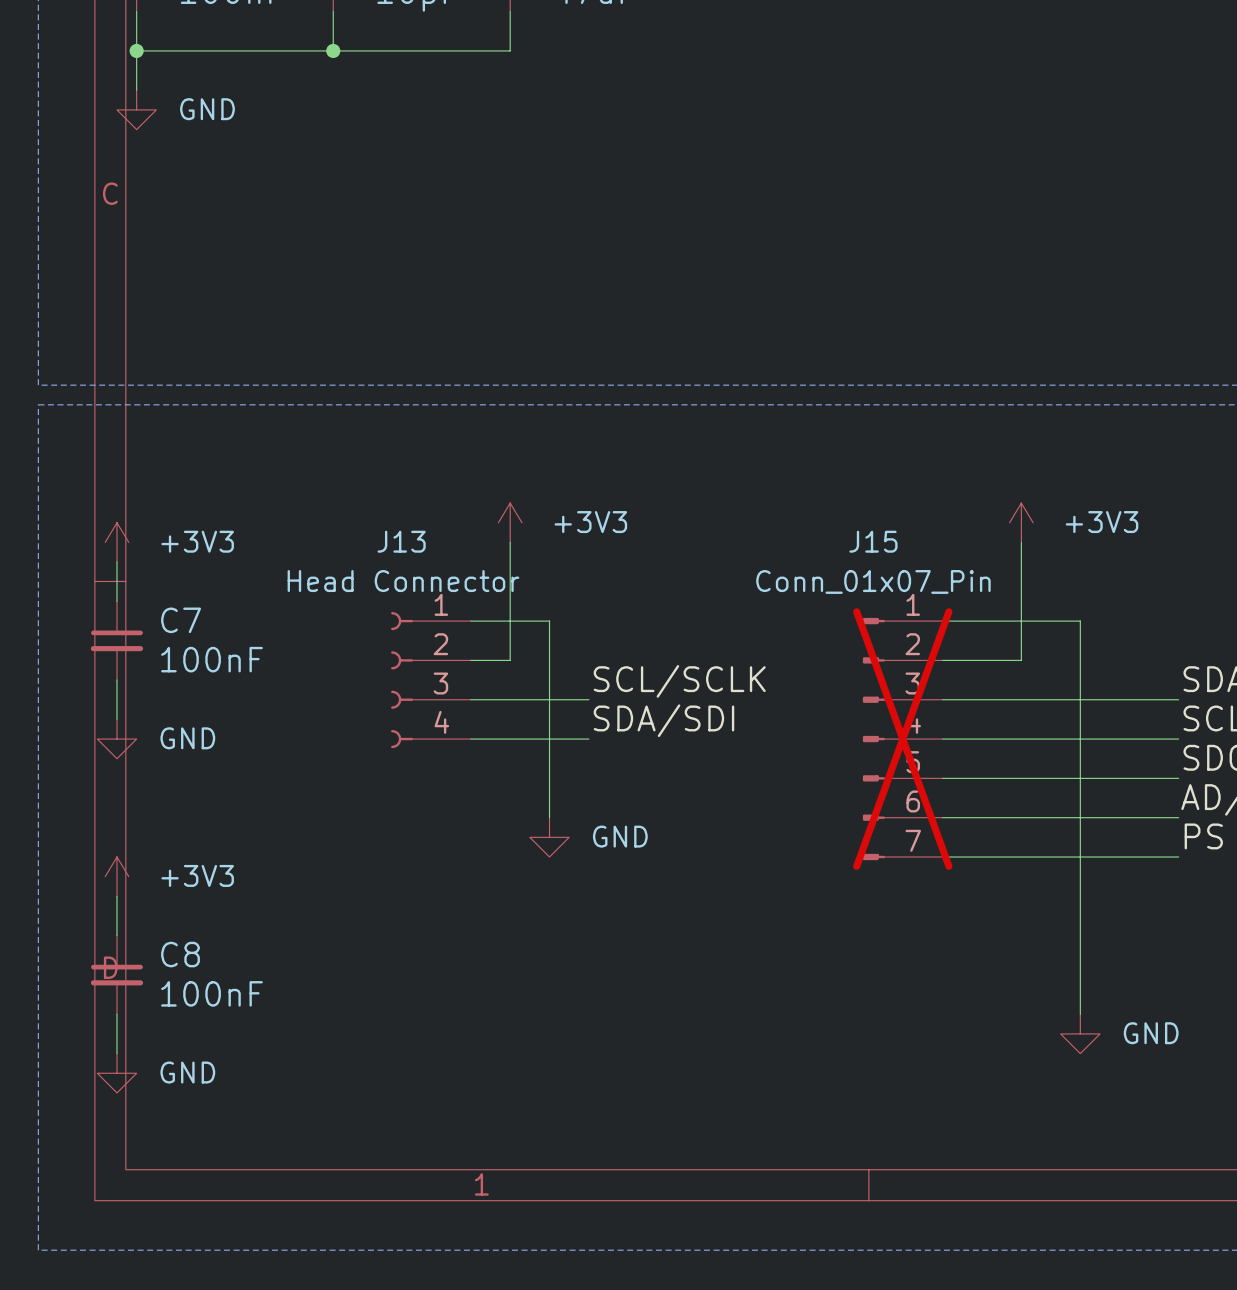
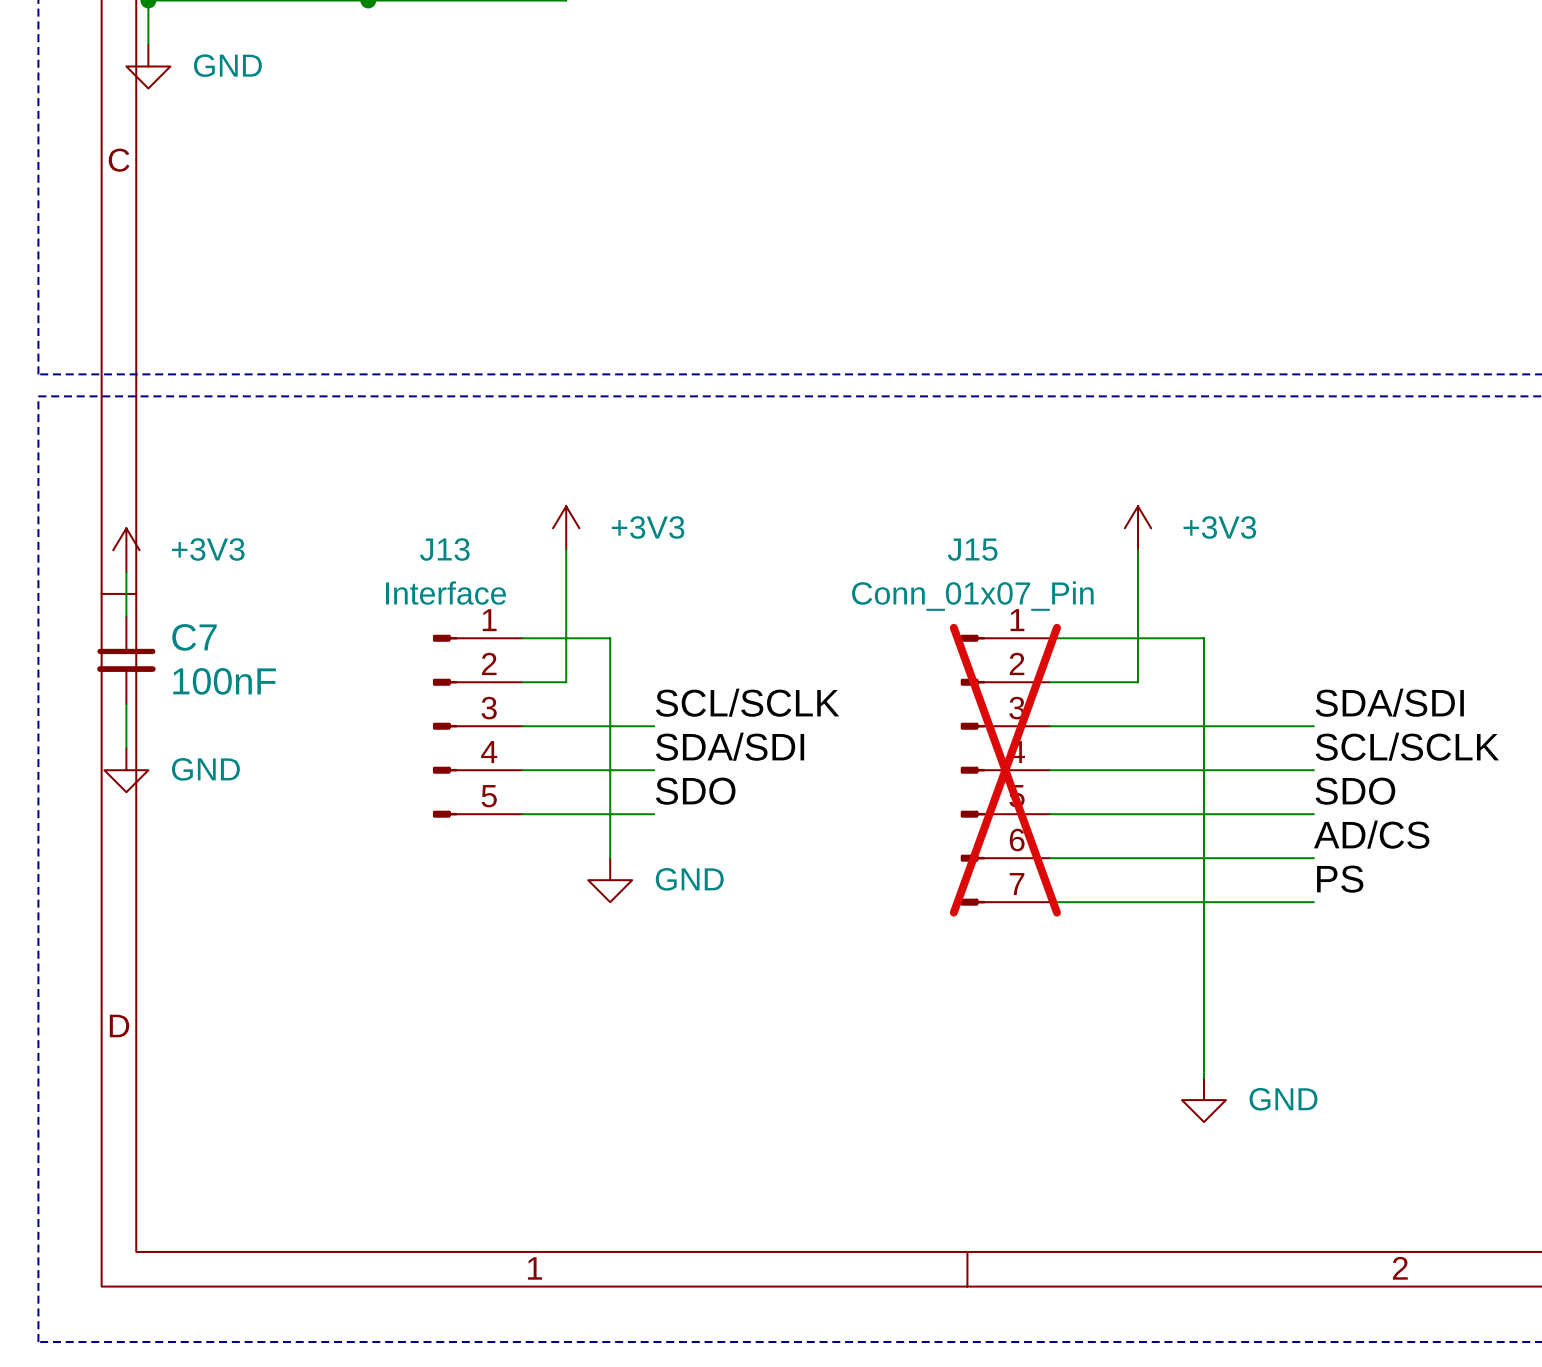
J13 value: Head Connector (403, 581) -> Interface (446, 593)
J13 symbol: [391, 612, 471, 749] -> [432, 634, 523, 818]
label: none -> SDO (695, 791)
wire: none -> (522, 814) (654, 814)
power symbol: +3V3 (116, 876) -> none
wire: (116, 896) (116, 935) -> none
C8: 100nF (116, 974) -> none
wire: (116, 1014) (116, 1053) -> none
power symbol: GND (116, 1073) -> none

